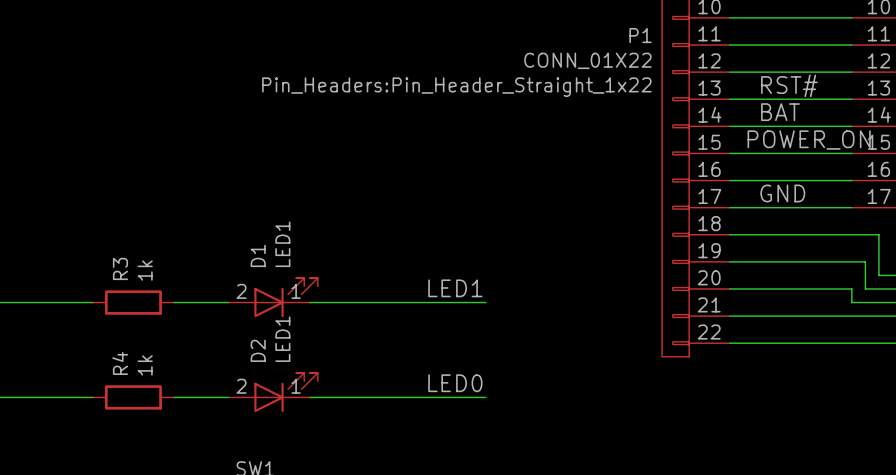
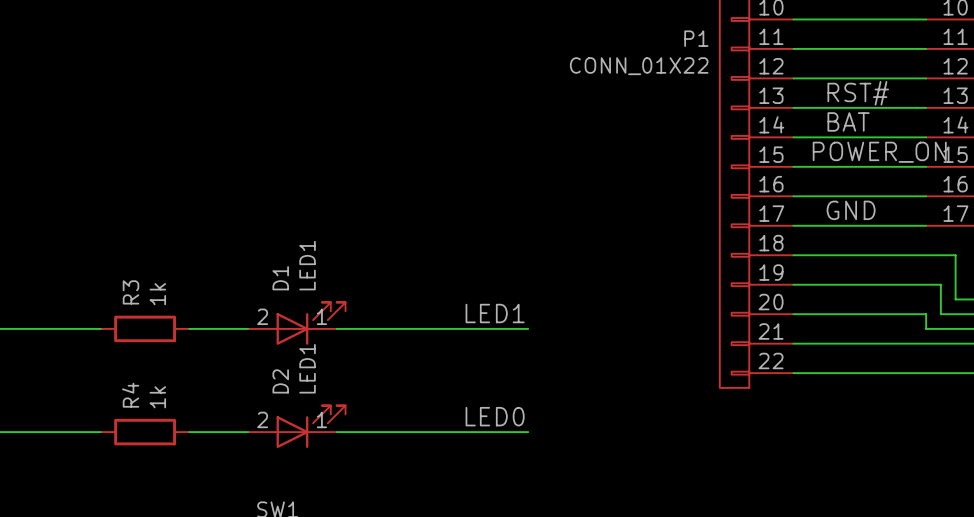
P1 text: Pin_Headers:Pin_Header_Straight_1x22 (456, 87) -> none

